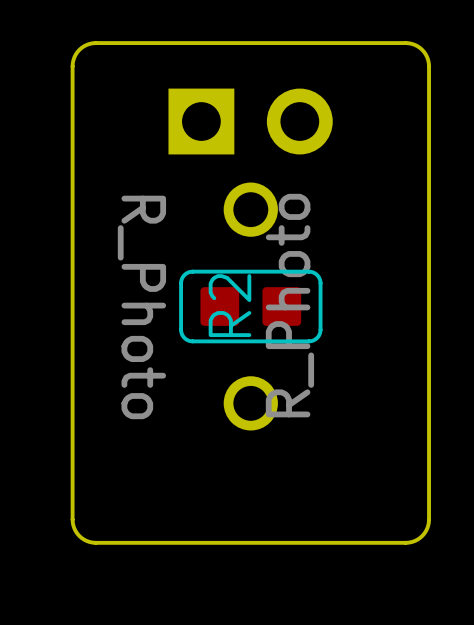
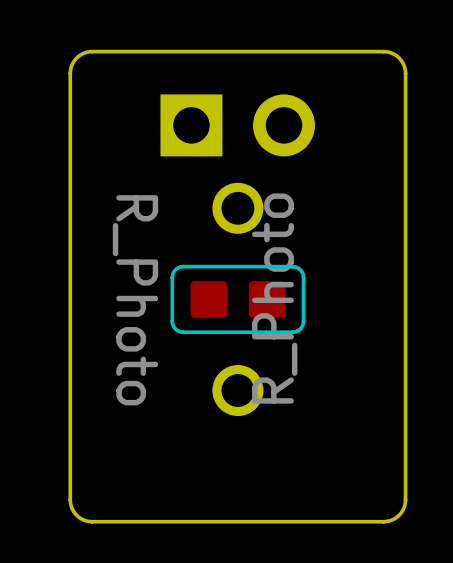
R2 name: R2 (229, 305) -> none

